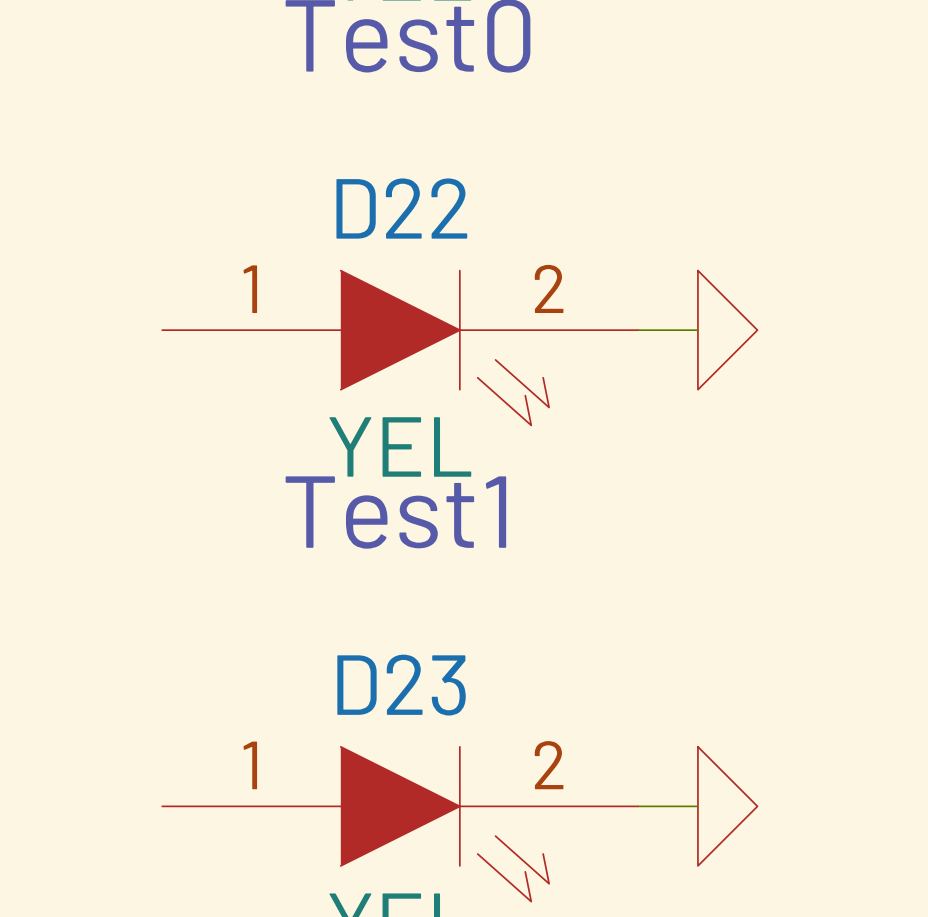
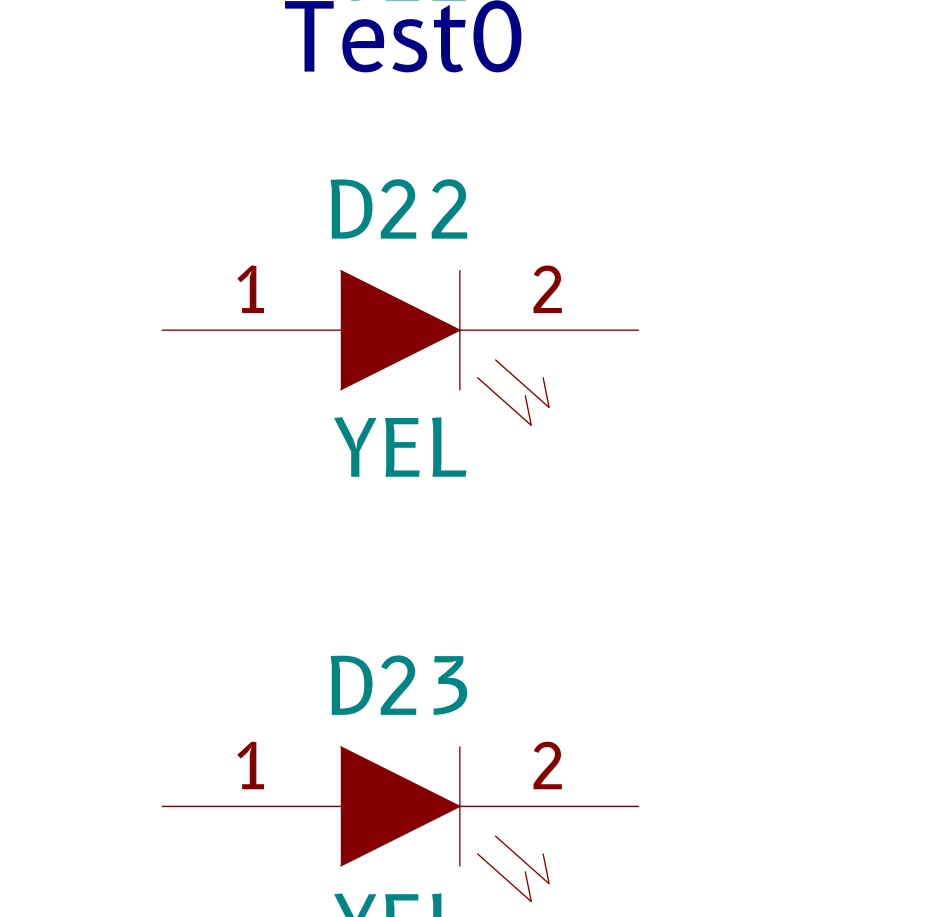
wire: (638, 330) (697, 330) -> none
power symbol: (727, 330) -> none
text: Test1 (395, 512) -> none
wire: (638, 806) (697, 806) -> none
power symbol: (727, 806) -> none

